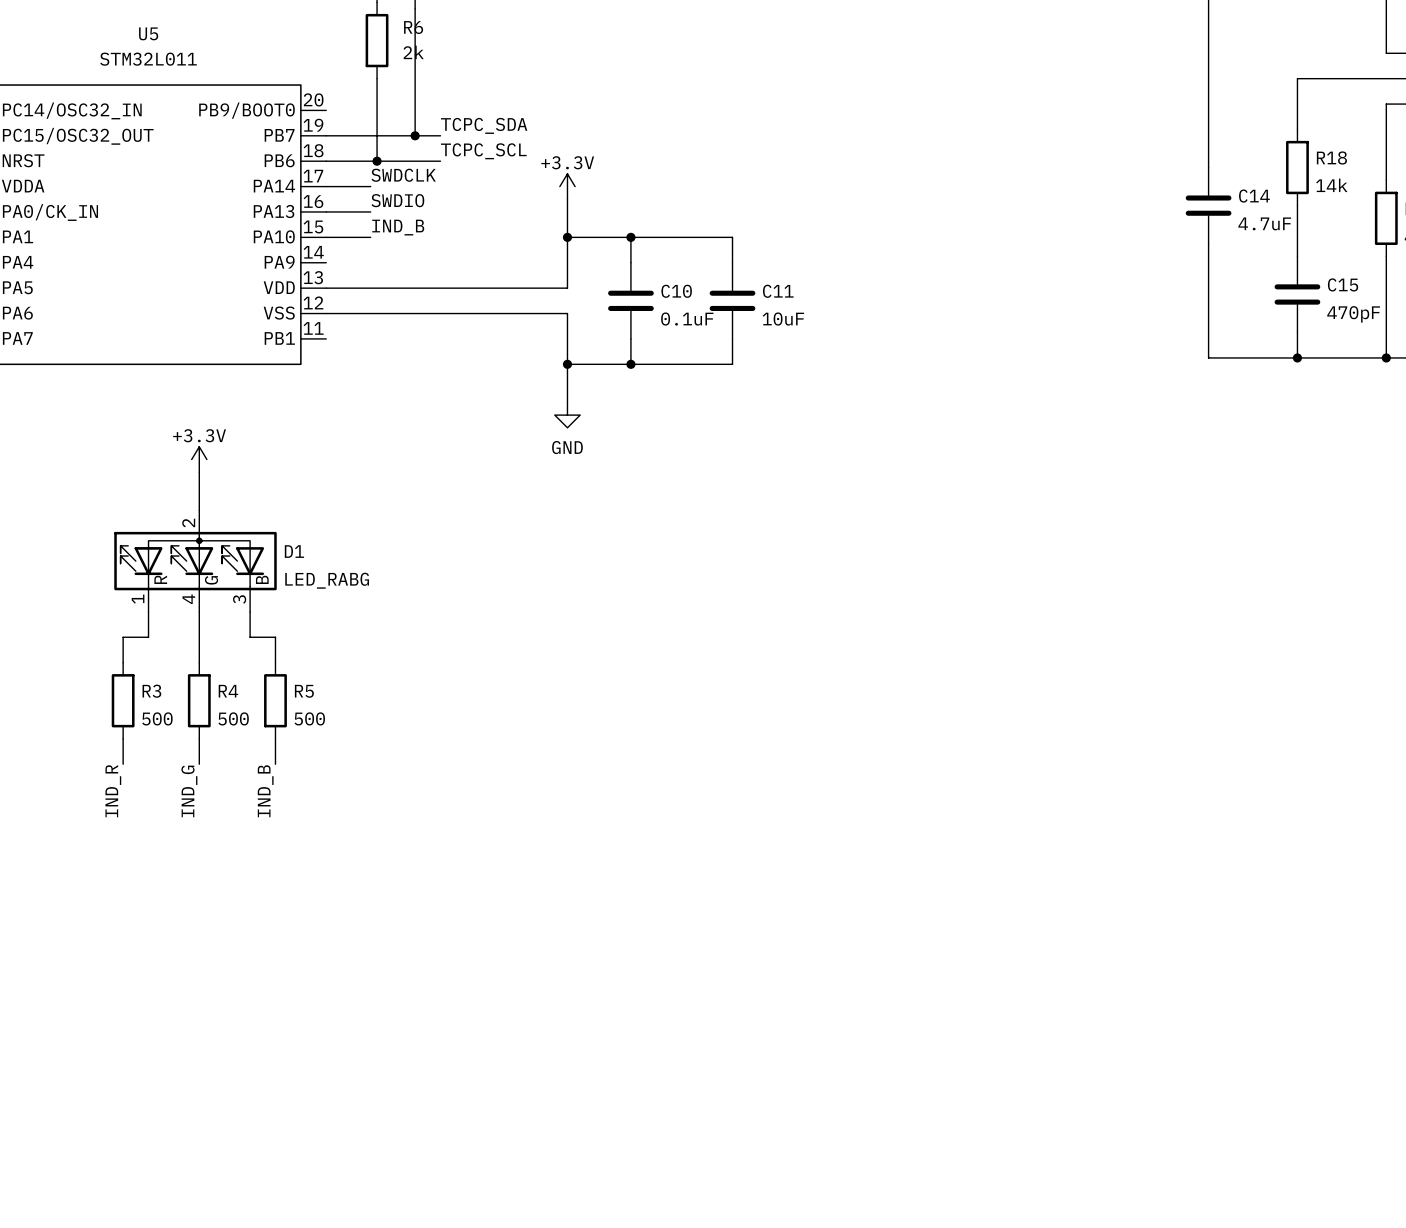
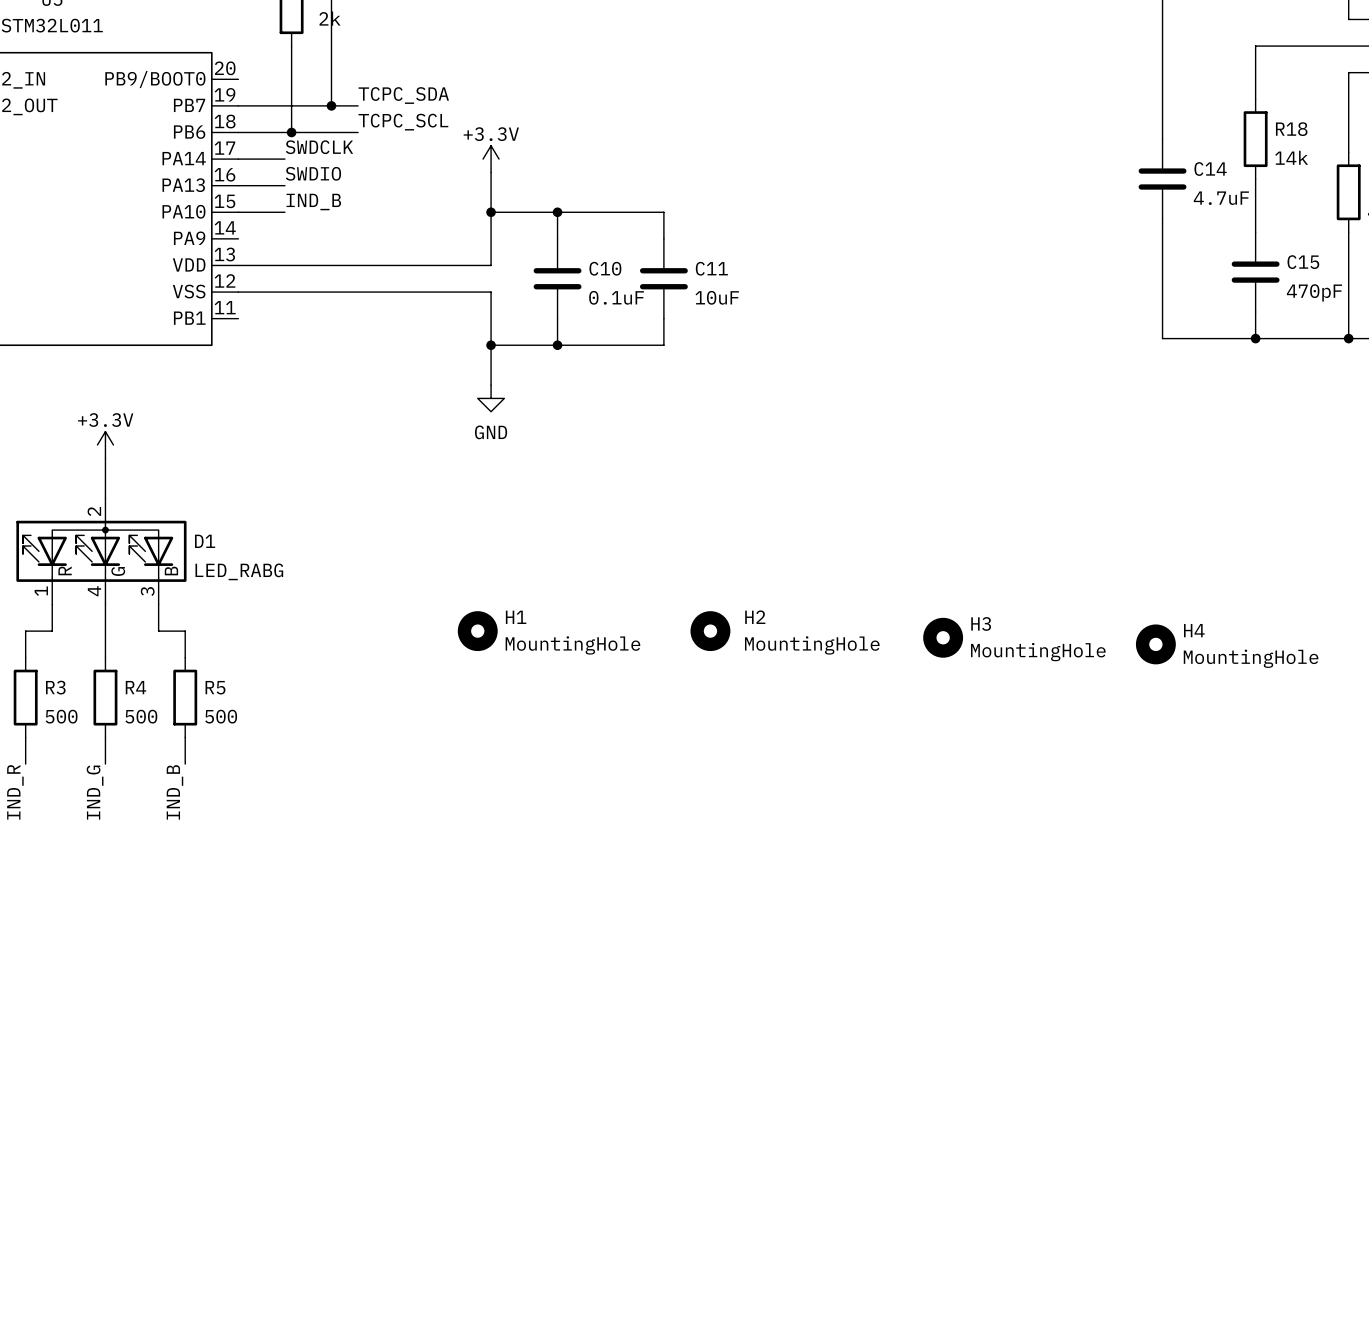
H1: none -> MountingHole (477, 631)
H2: none -> MountingHole (710, 631)
H3: none -> MountingHole (943, 637)
H4: none -> MountingHole (1155, 644)

